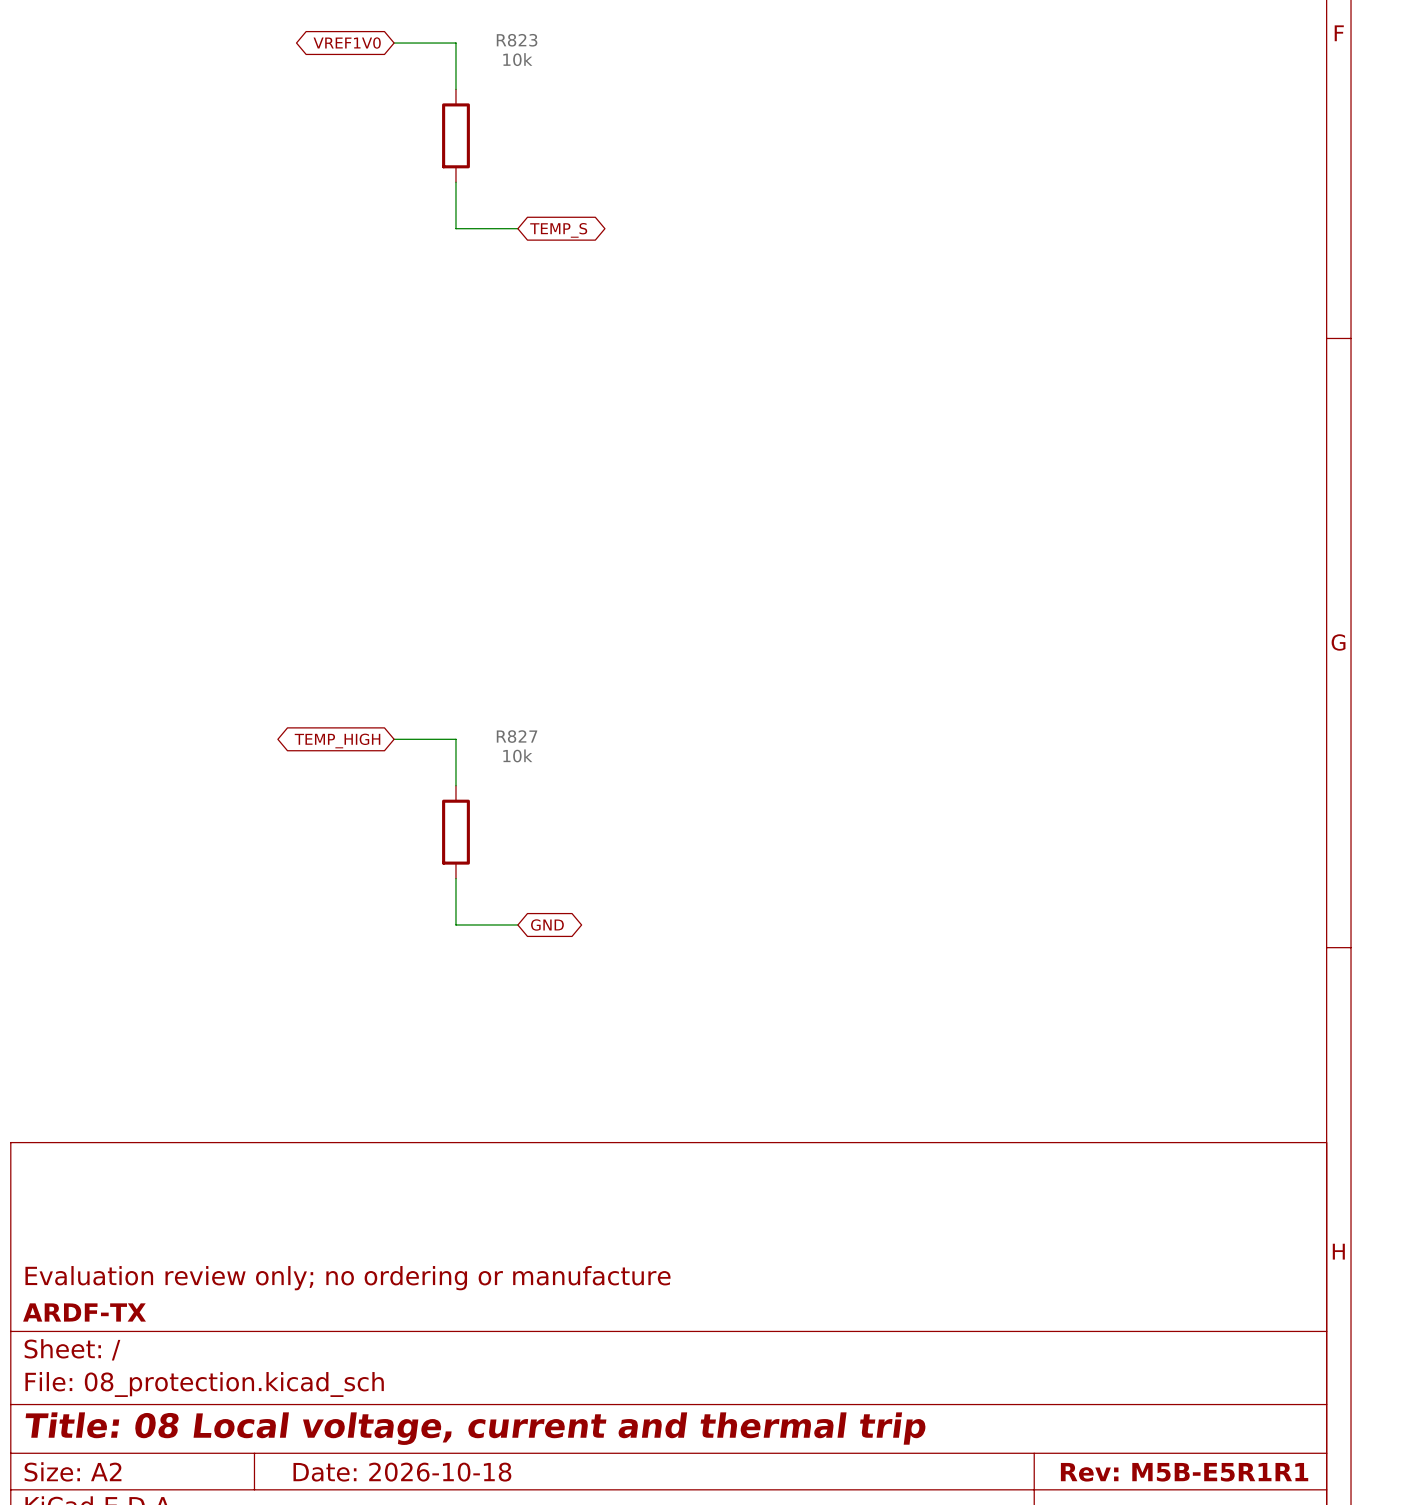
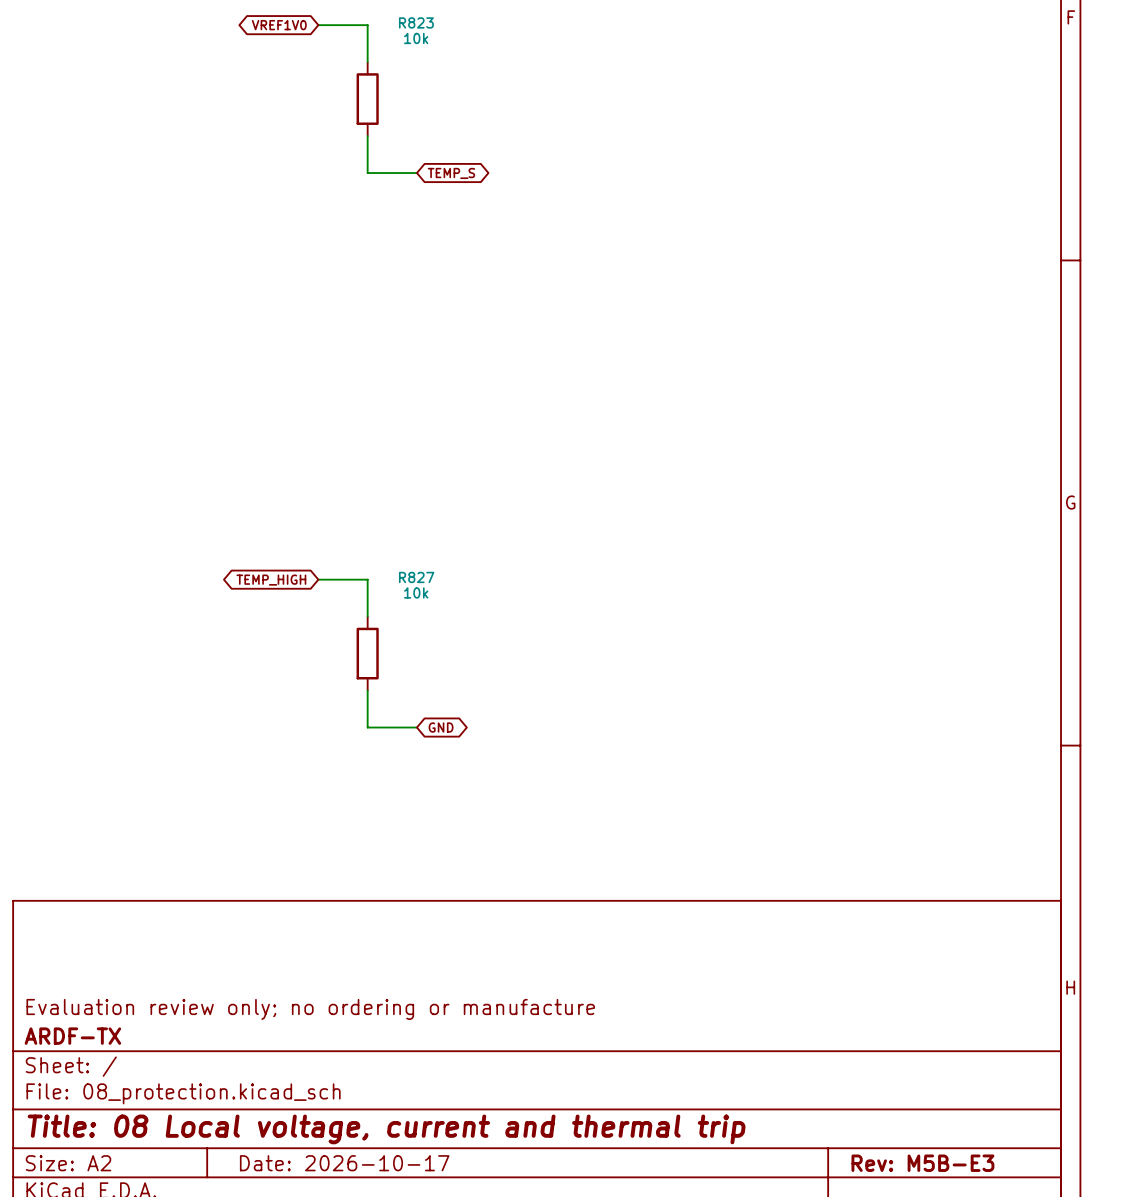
title block: Date: 2026-10-18 (402, 1472) -> Date: 2026-10-17 (344, 1163)
title block: Rev: M5B-E5R1R1 (1184, 1472) -> Rev: M5B-E3 (922, 1163)

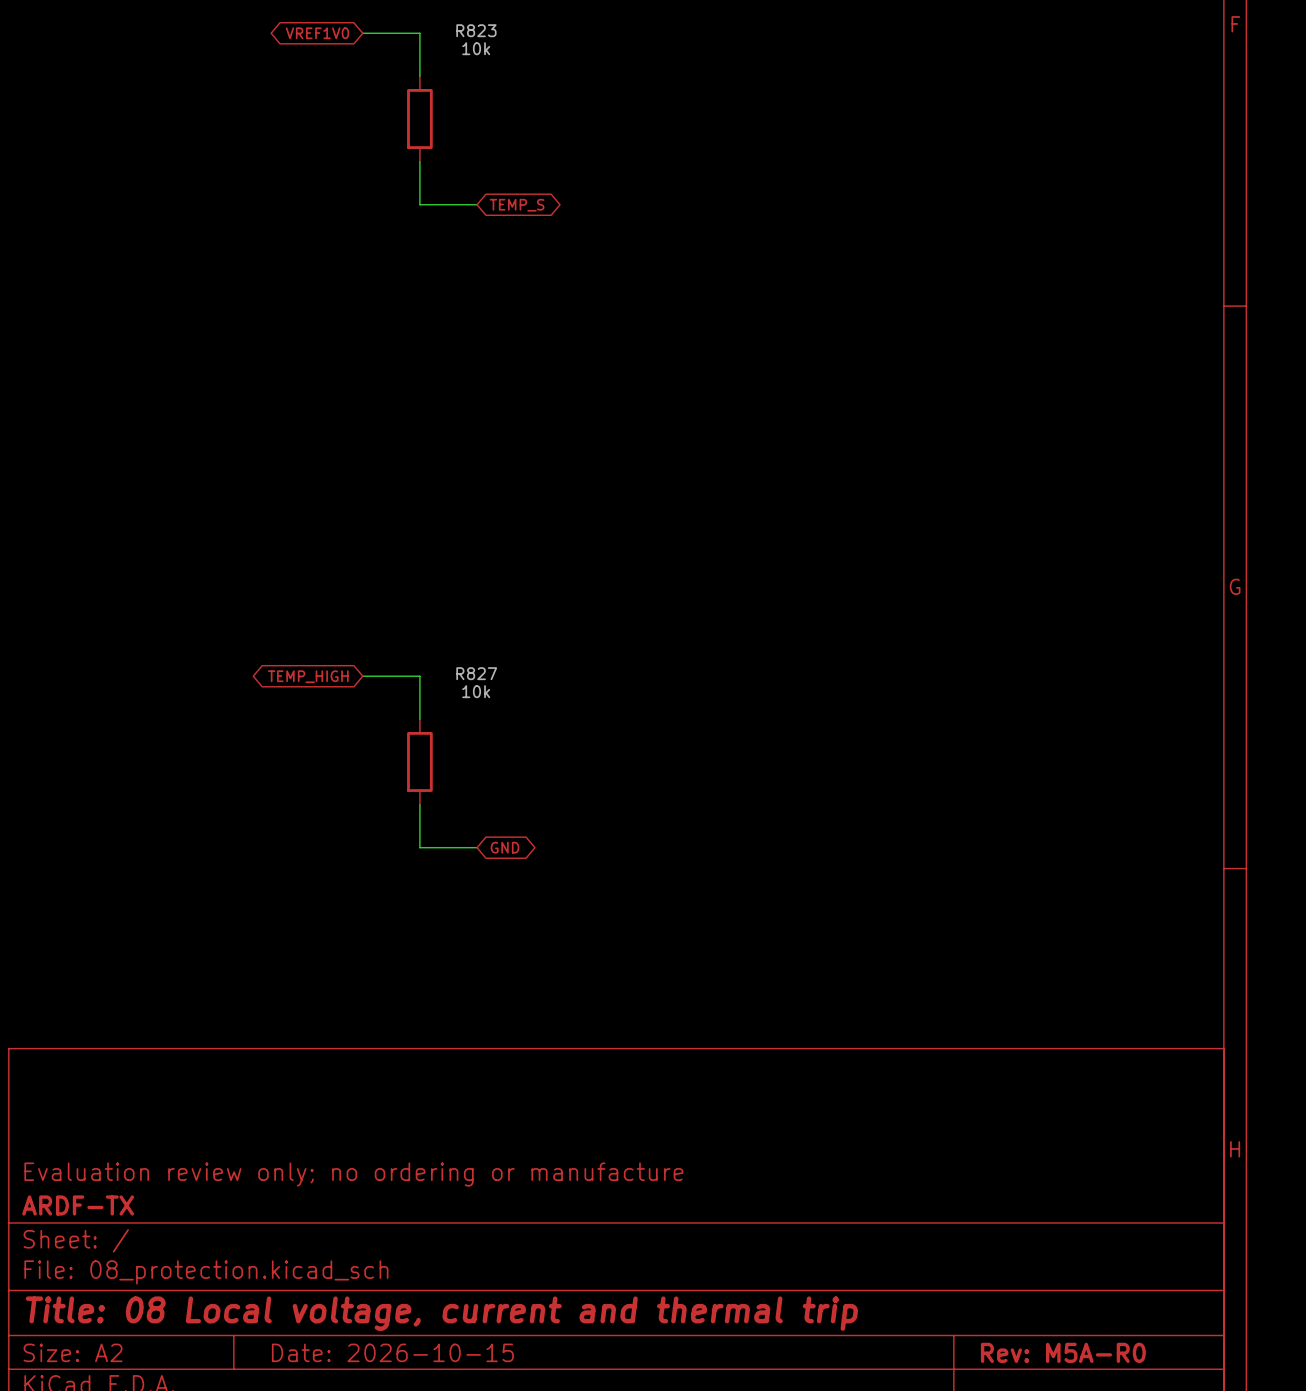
title block: Date: 2026-10-17 (344, 1163) -> Date: 2026-10-15 (392, 1352)
title block: Rev: M5B-E3 (922, 1163) -> Rev: M5A-R0 (1063, 1352)

